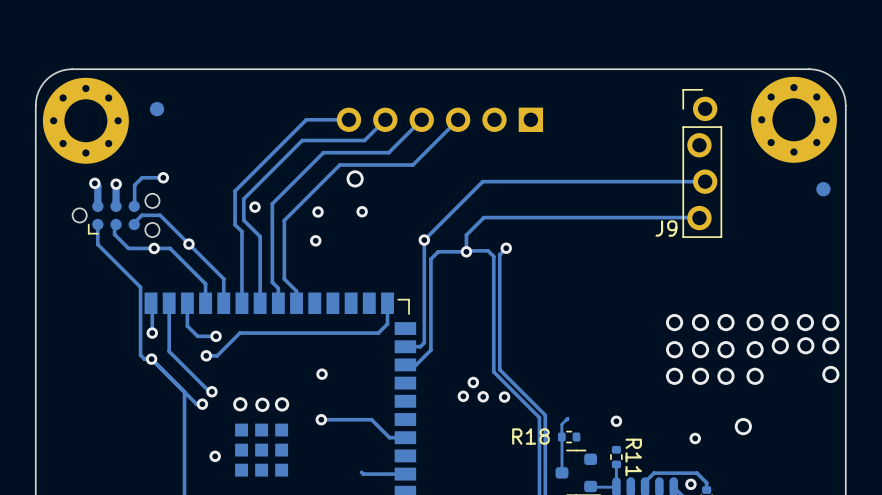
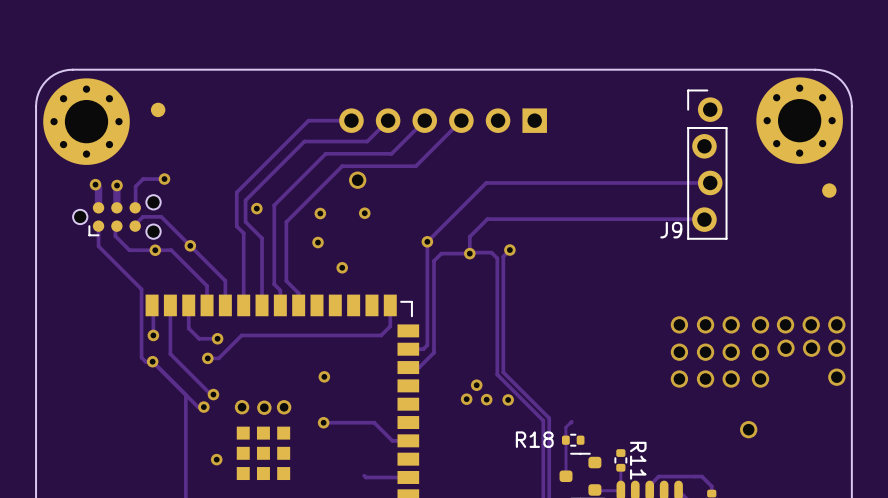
via: none -> (342, 267)
via: (616, 421) -> none
via: (695, 438) -> none
via: (690, 484) -> none

